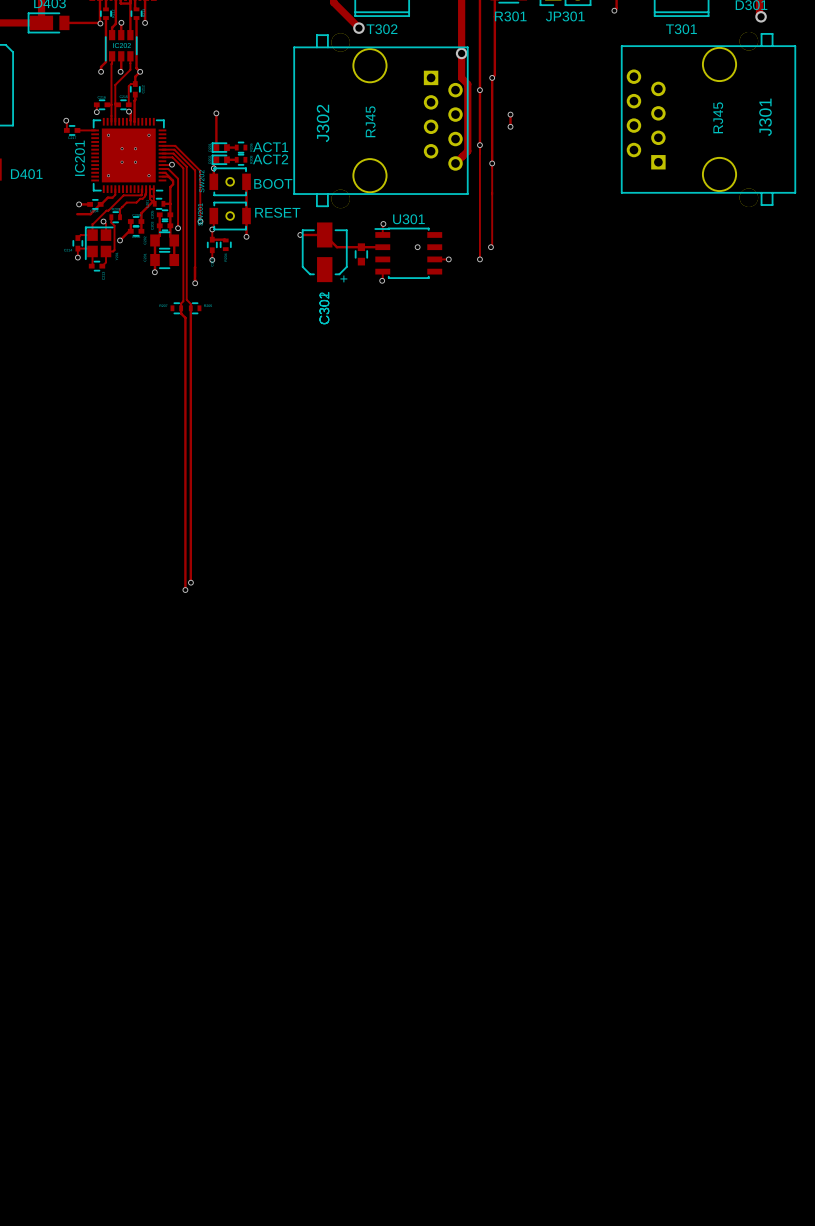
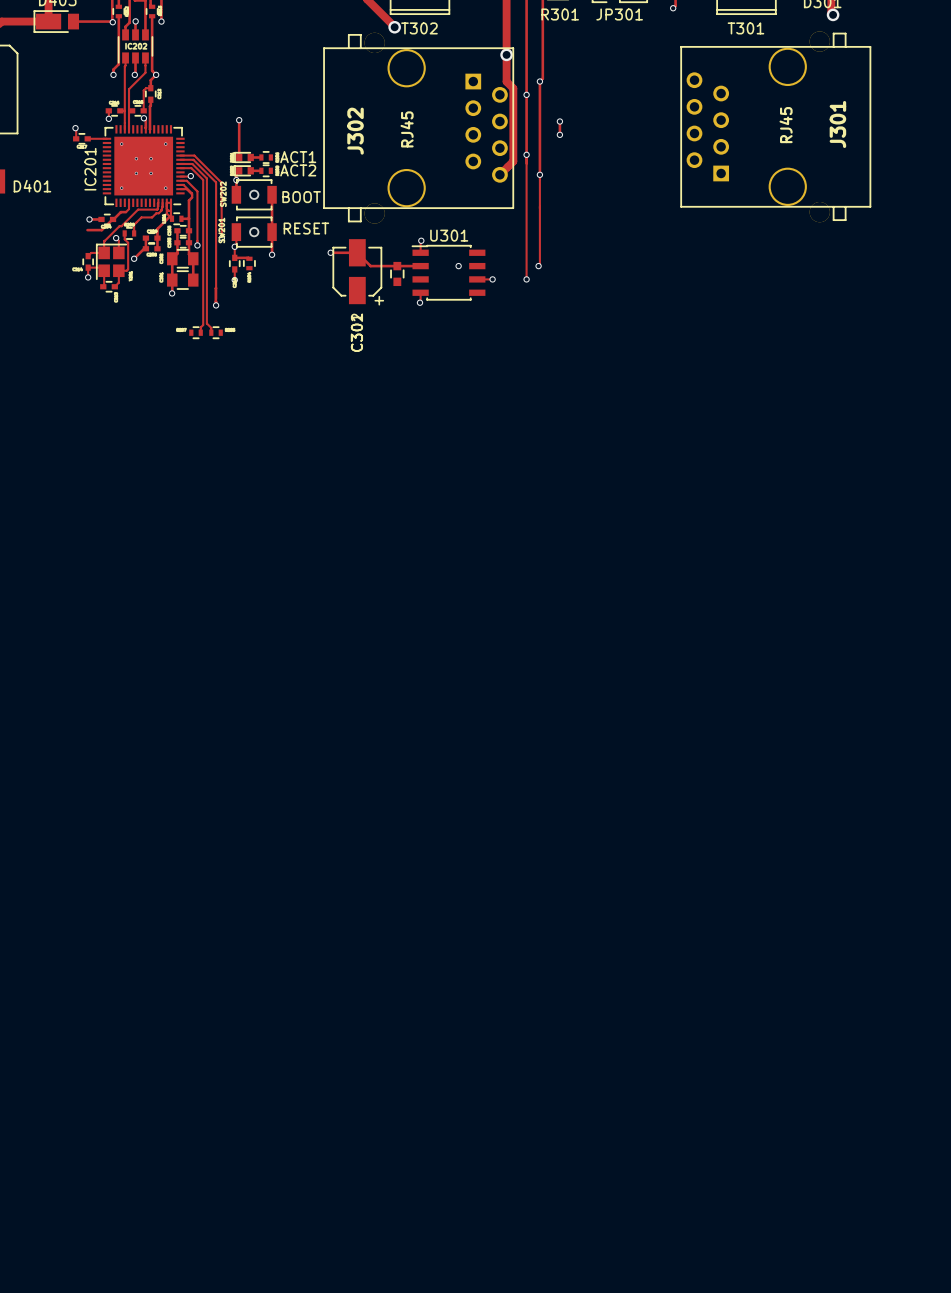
track: (181, 308) (181, 313) (185, 317) (185, 590) -> none
track: (190, 308) (190, 582) -> none
via: (190, 582) -> none
via: (185, 590) -> none

